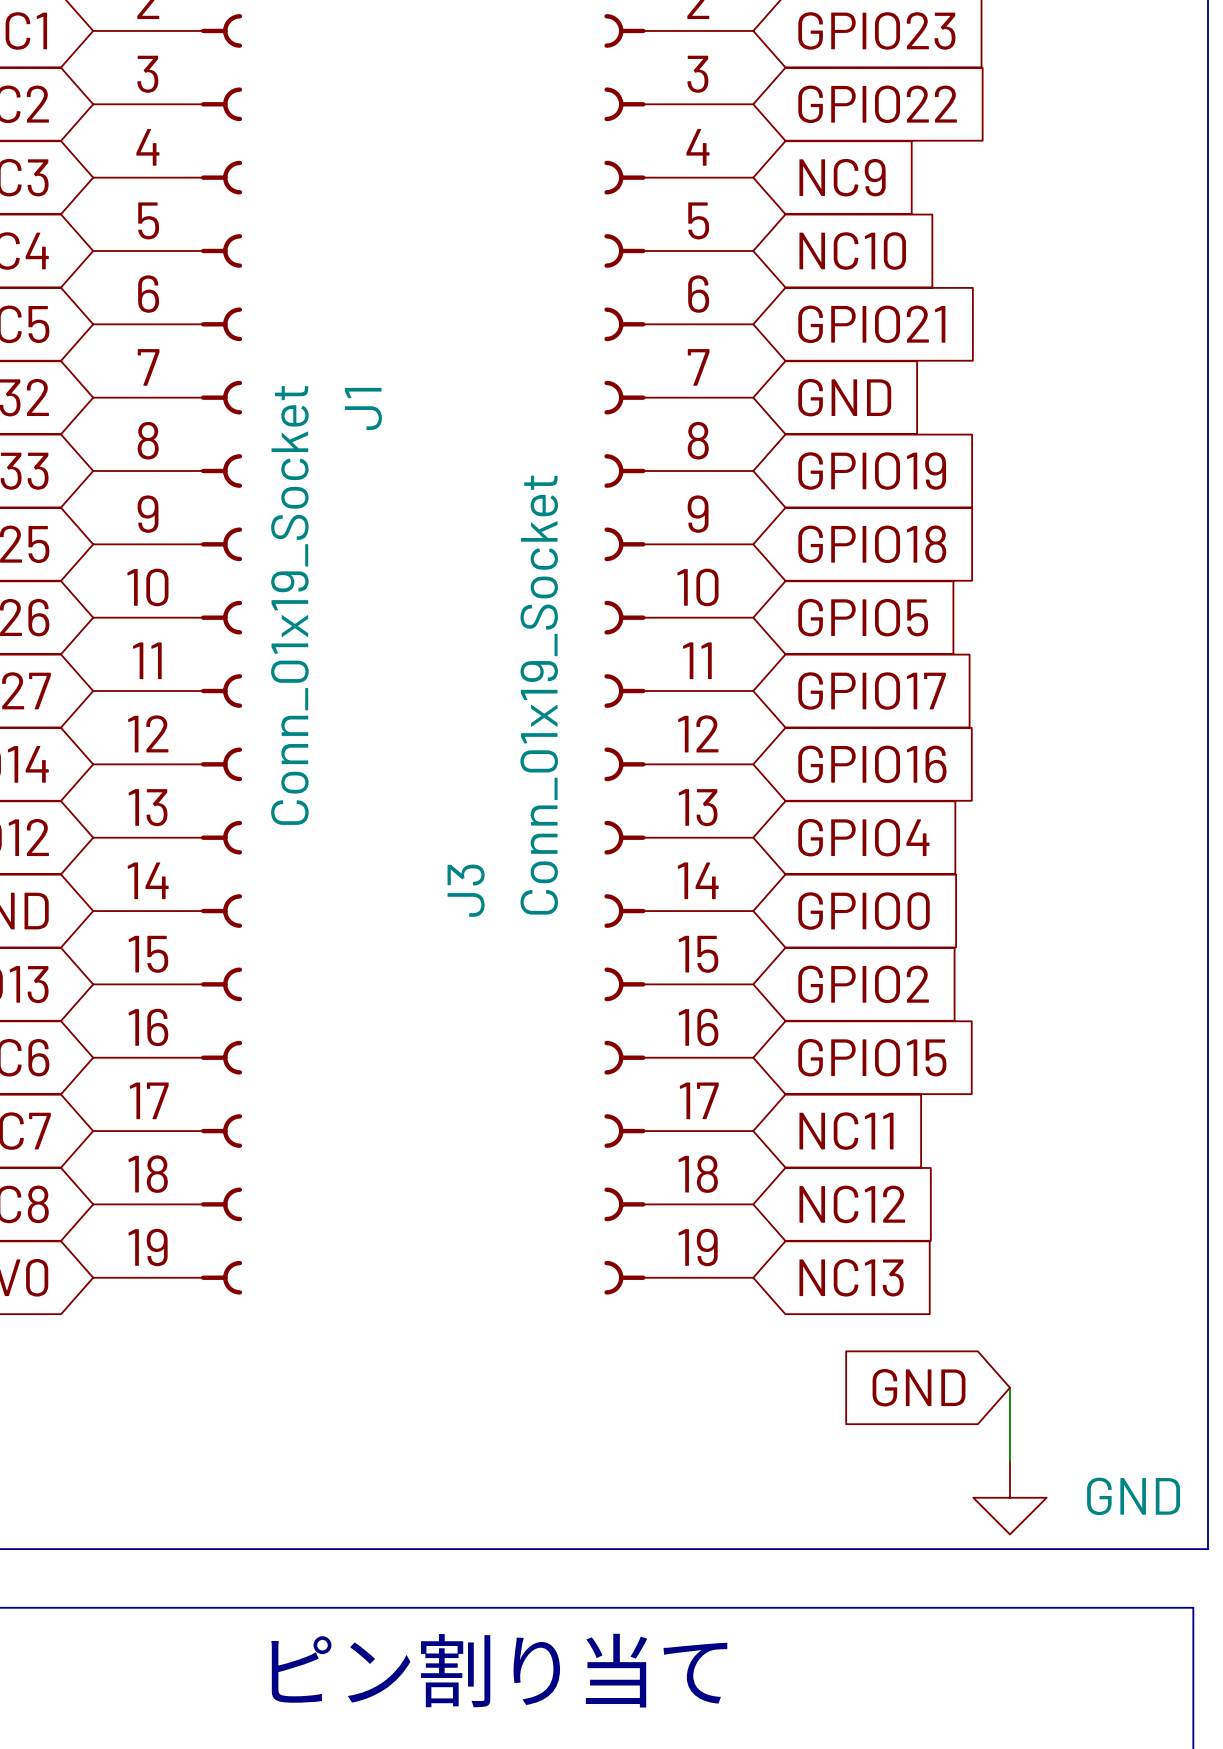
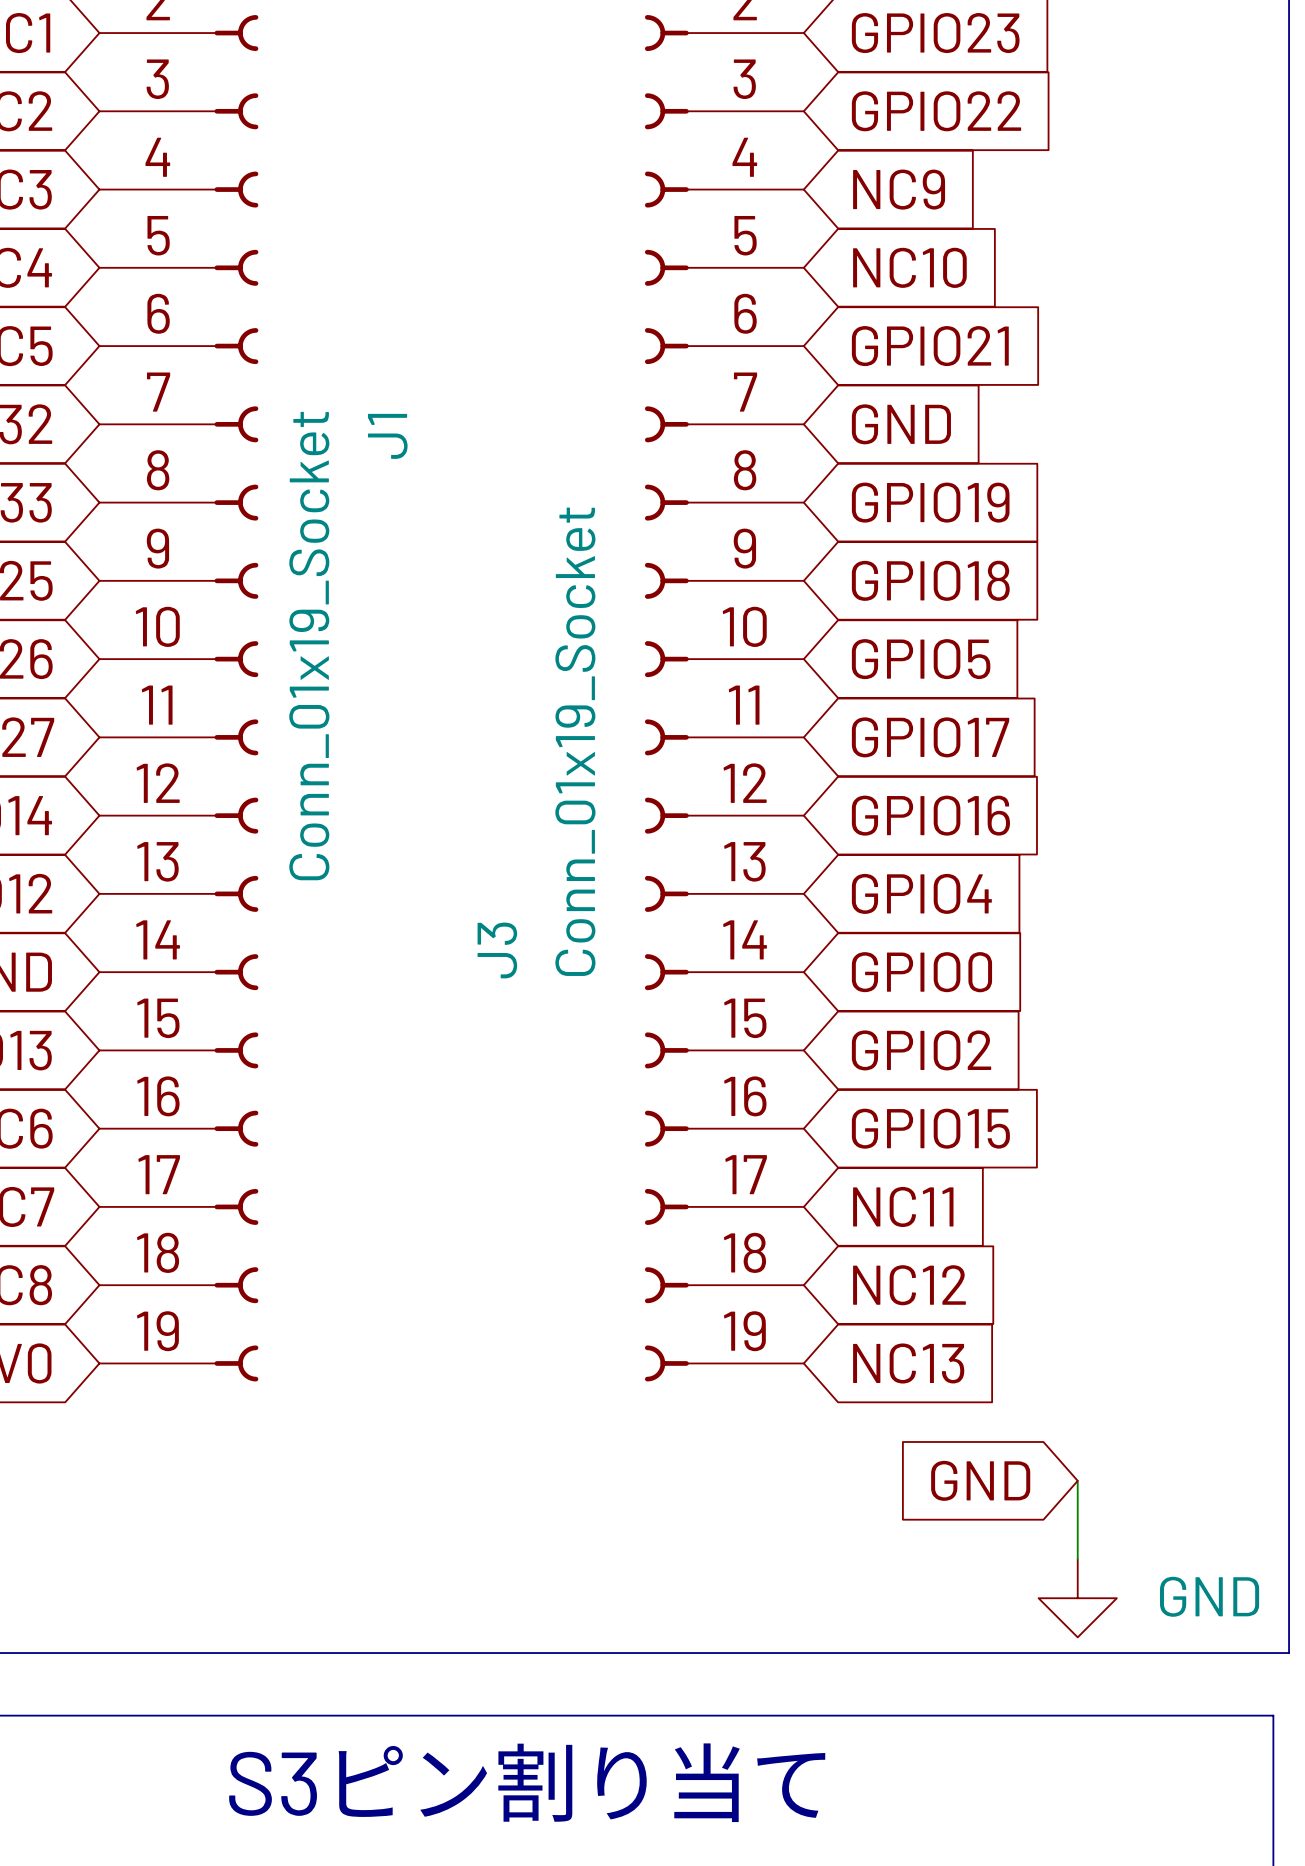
text: ピン割り当て (499, 1670) -> S3ピン割り当て (527, 1782)

